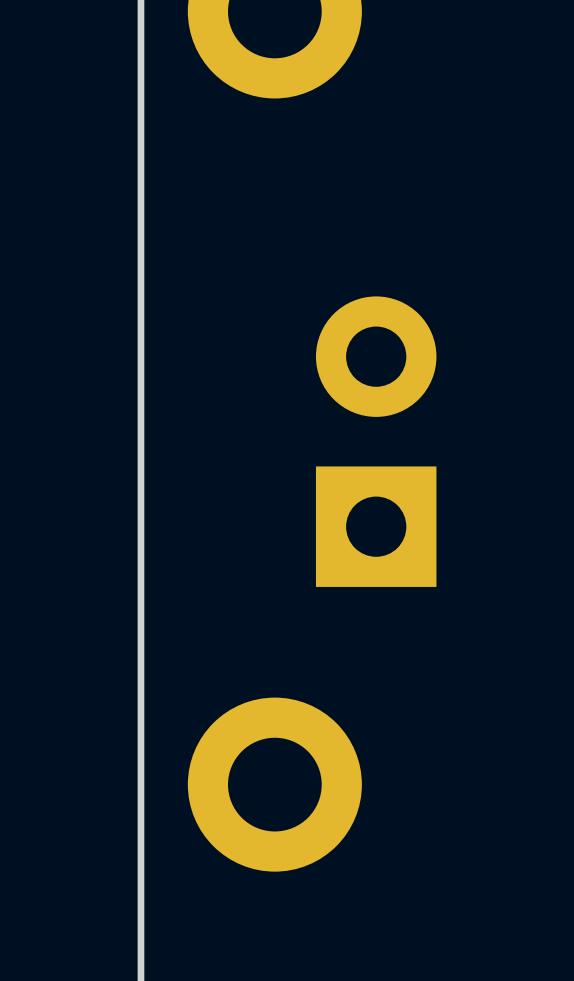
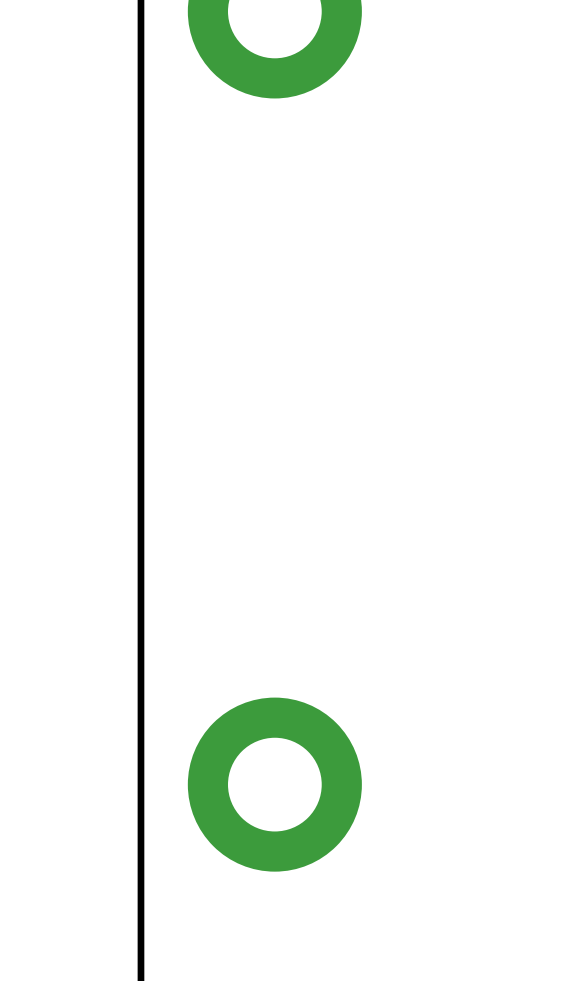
part: (376, 441) -> none

